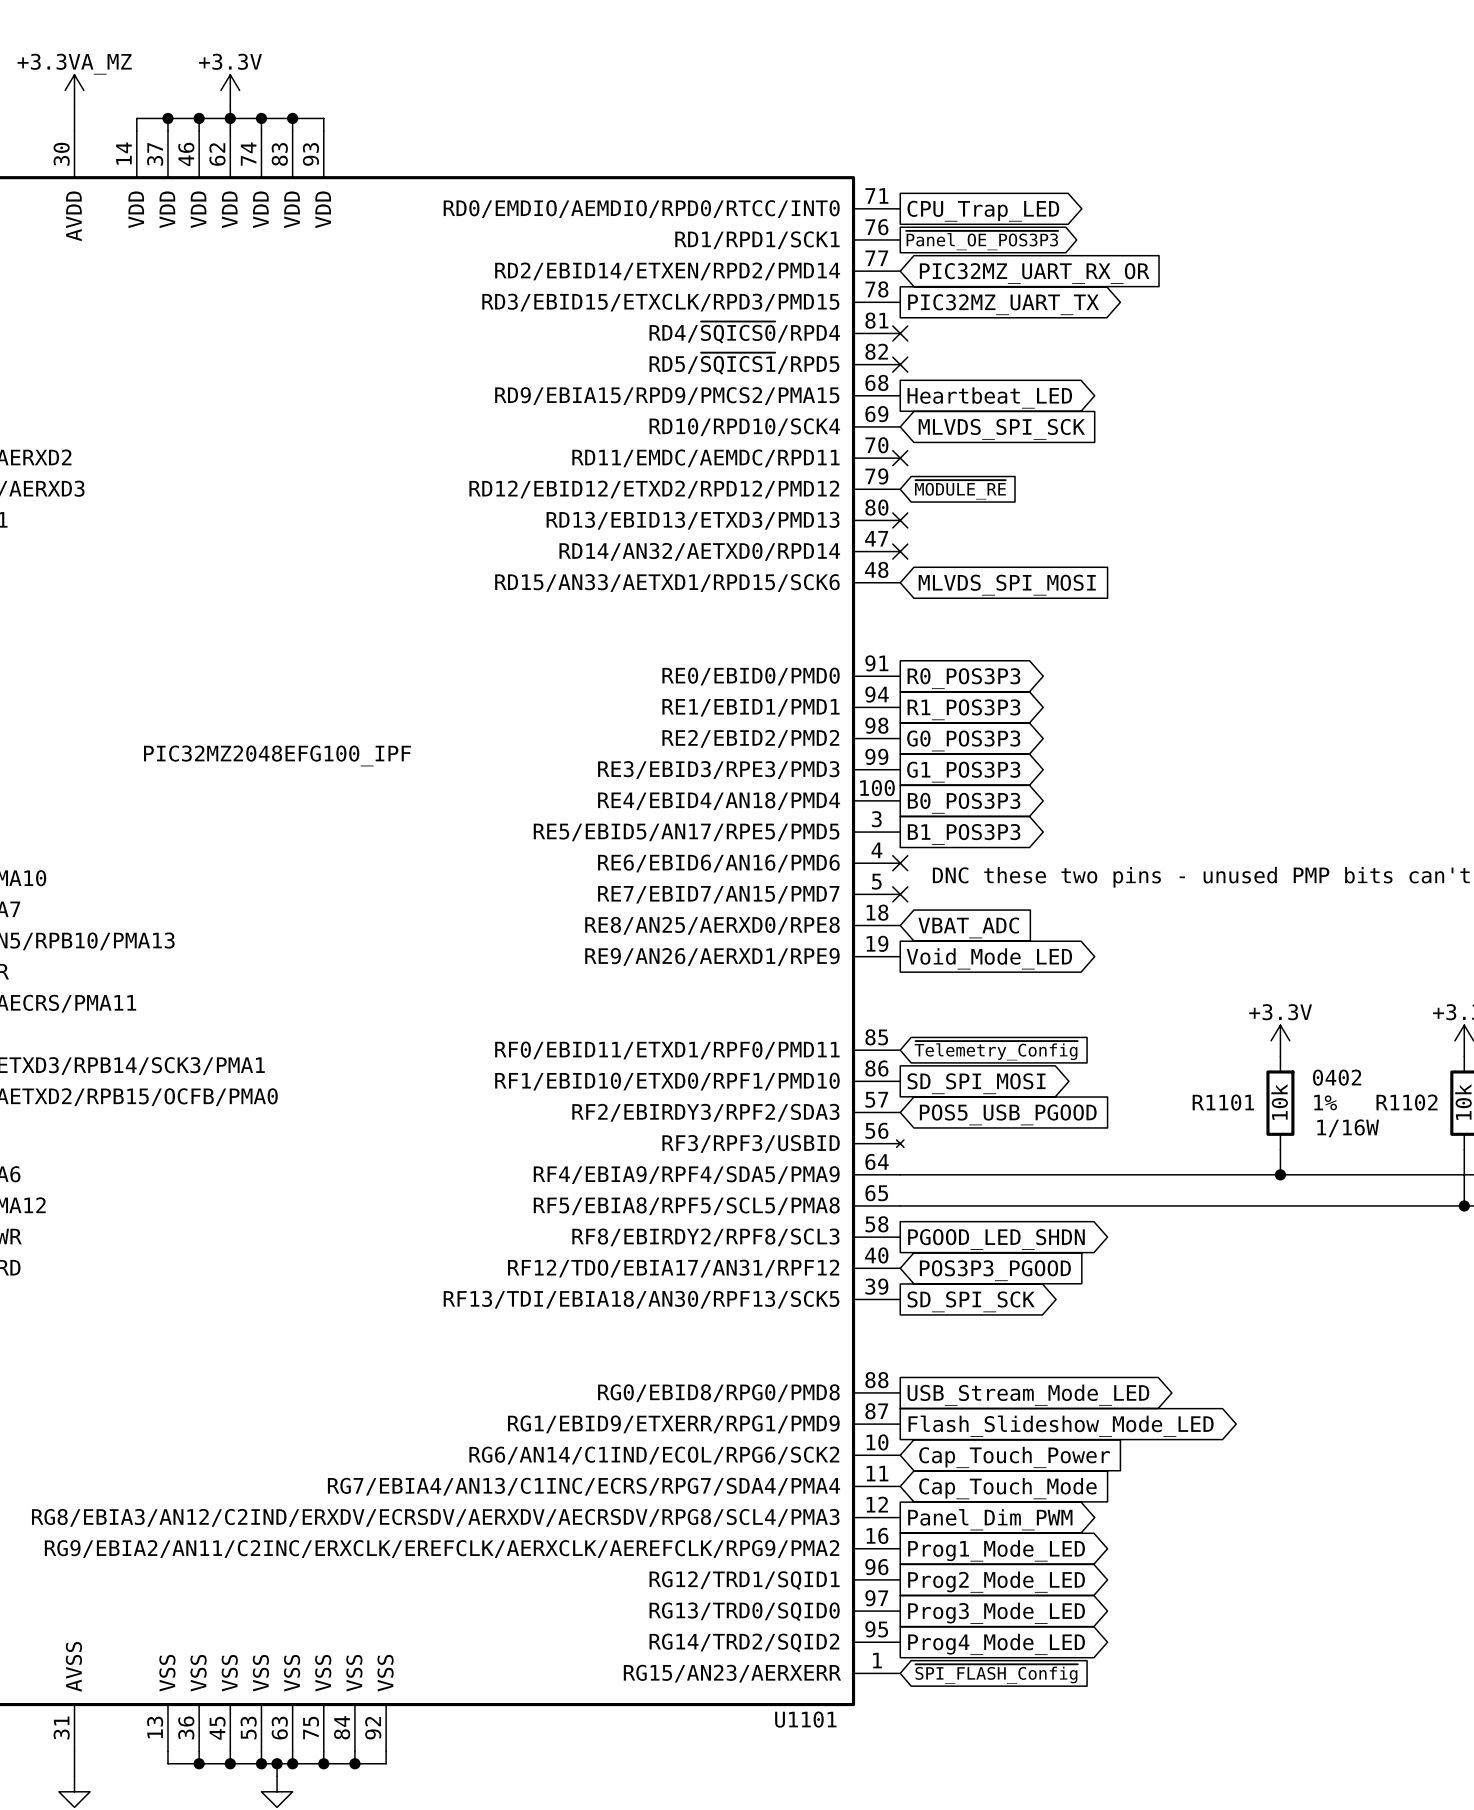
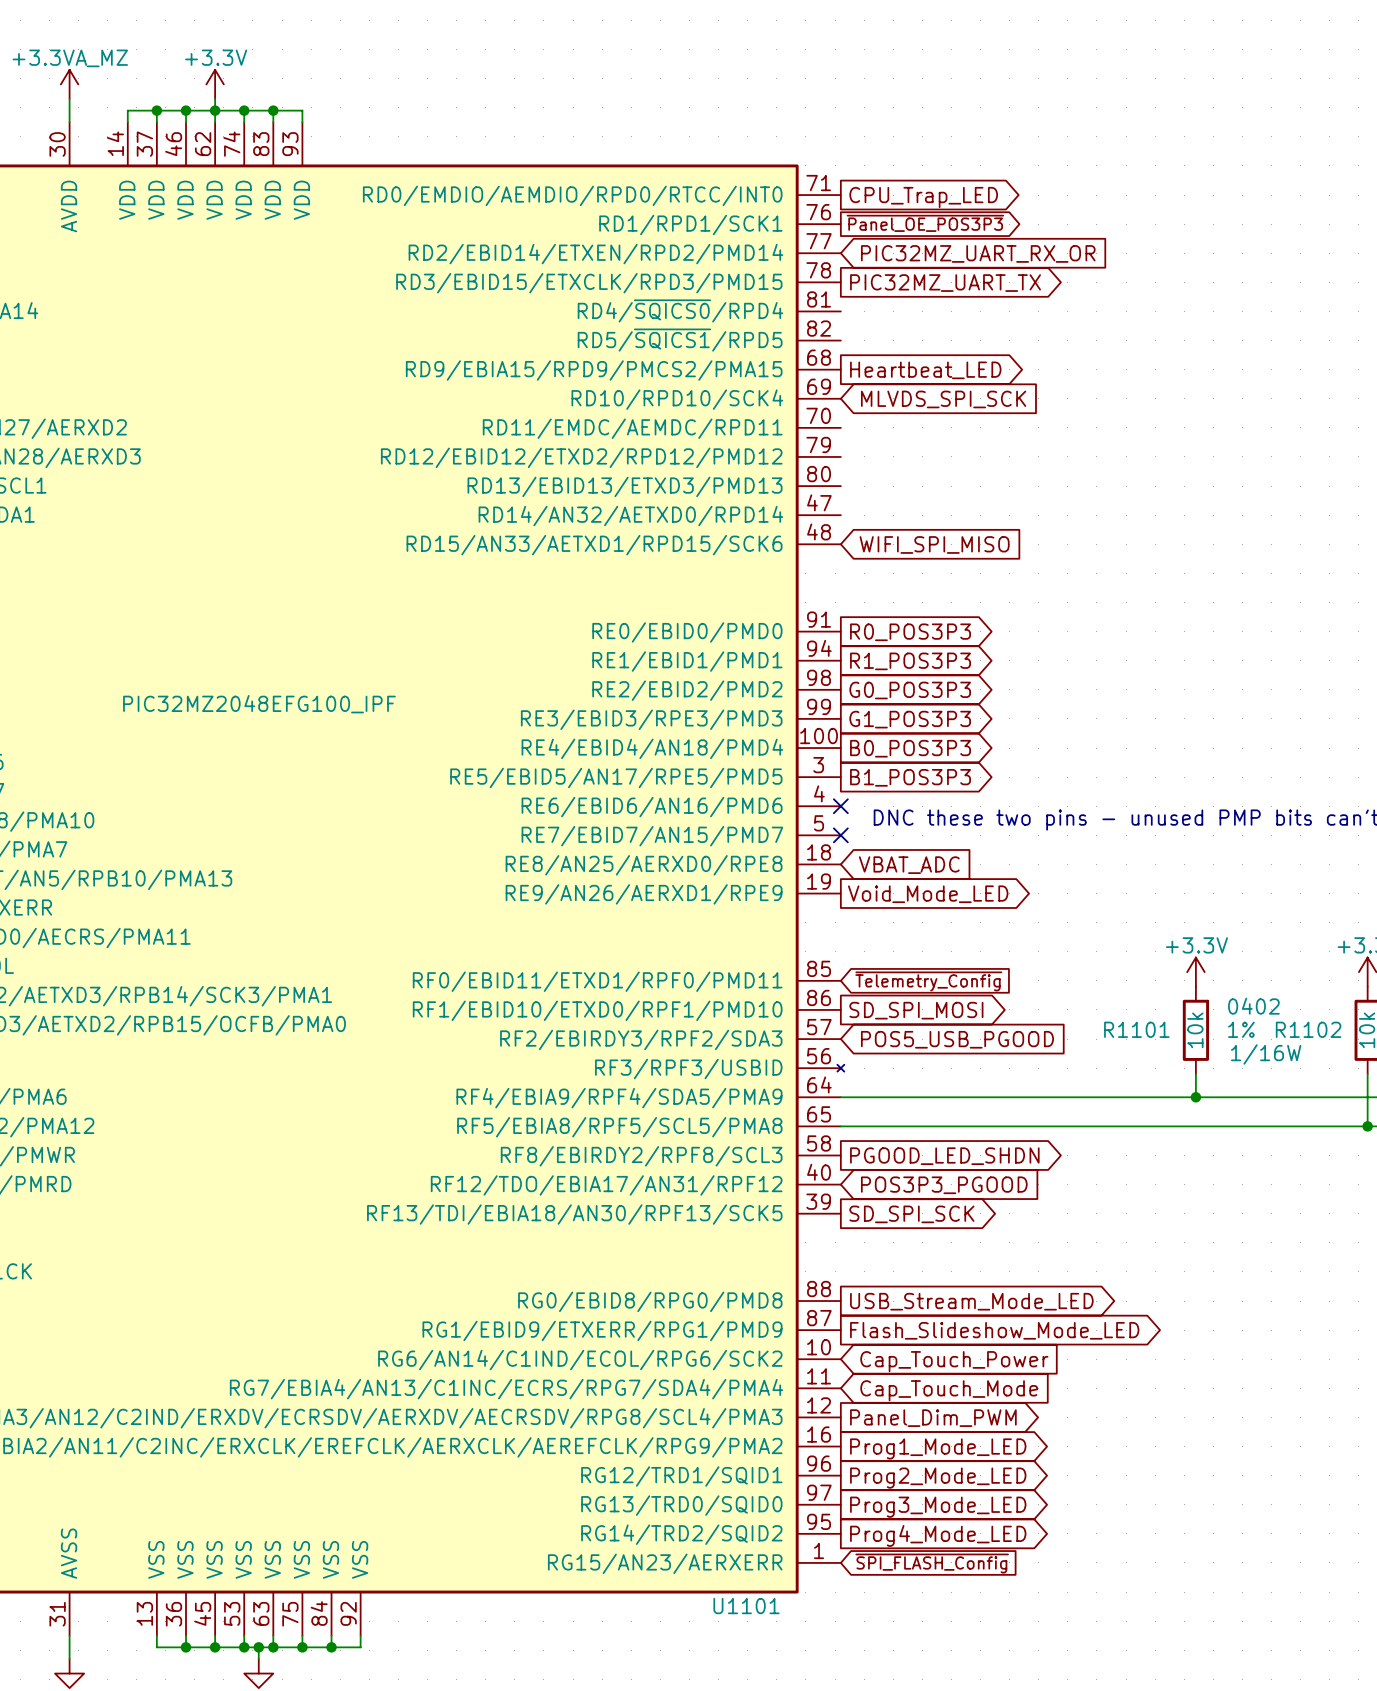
no-connect mark: (900, 333) -> none
no-connect mark: (900, 364) -> none
no-connect mark: (900, 458) -> none
global label: ~{MODULE_RE} (960, 489) -> none
no-connect mark: (900, 520) -> none
no-connect mark: (900, 551) -> none
global label: MLVDS_SPI_MOSI (1007, 585) -> WIFI_SPI_MISO (934, 544)

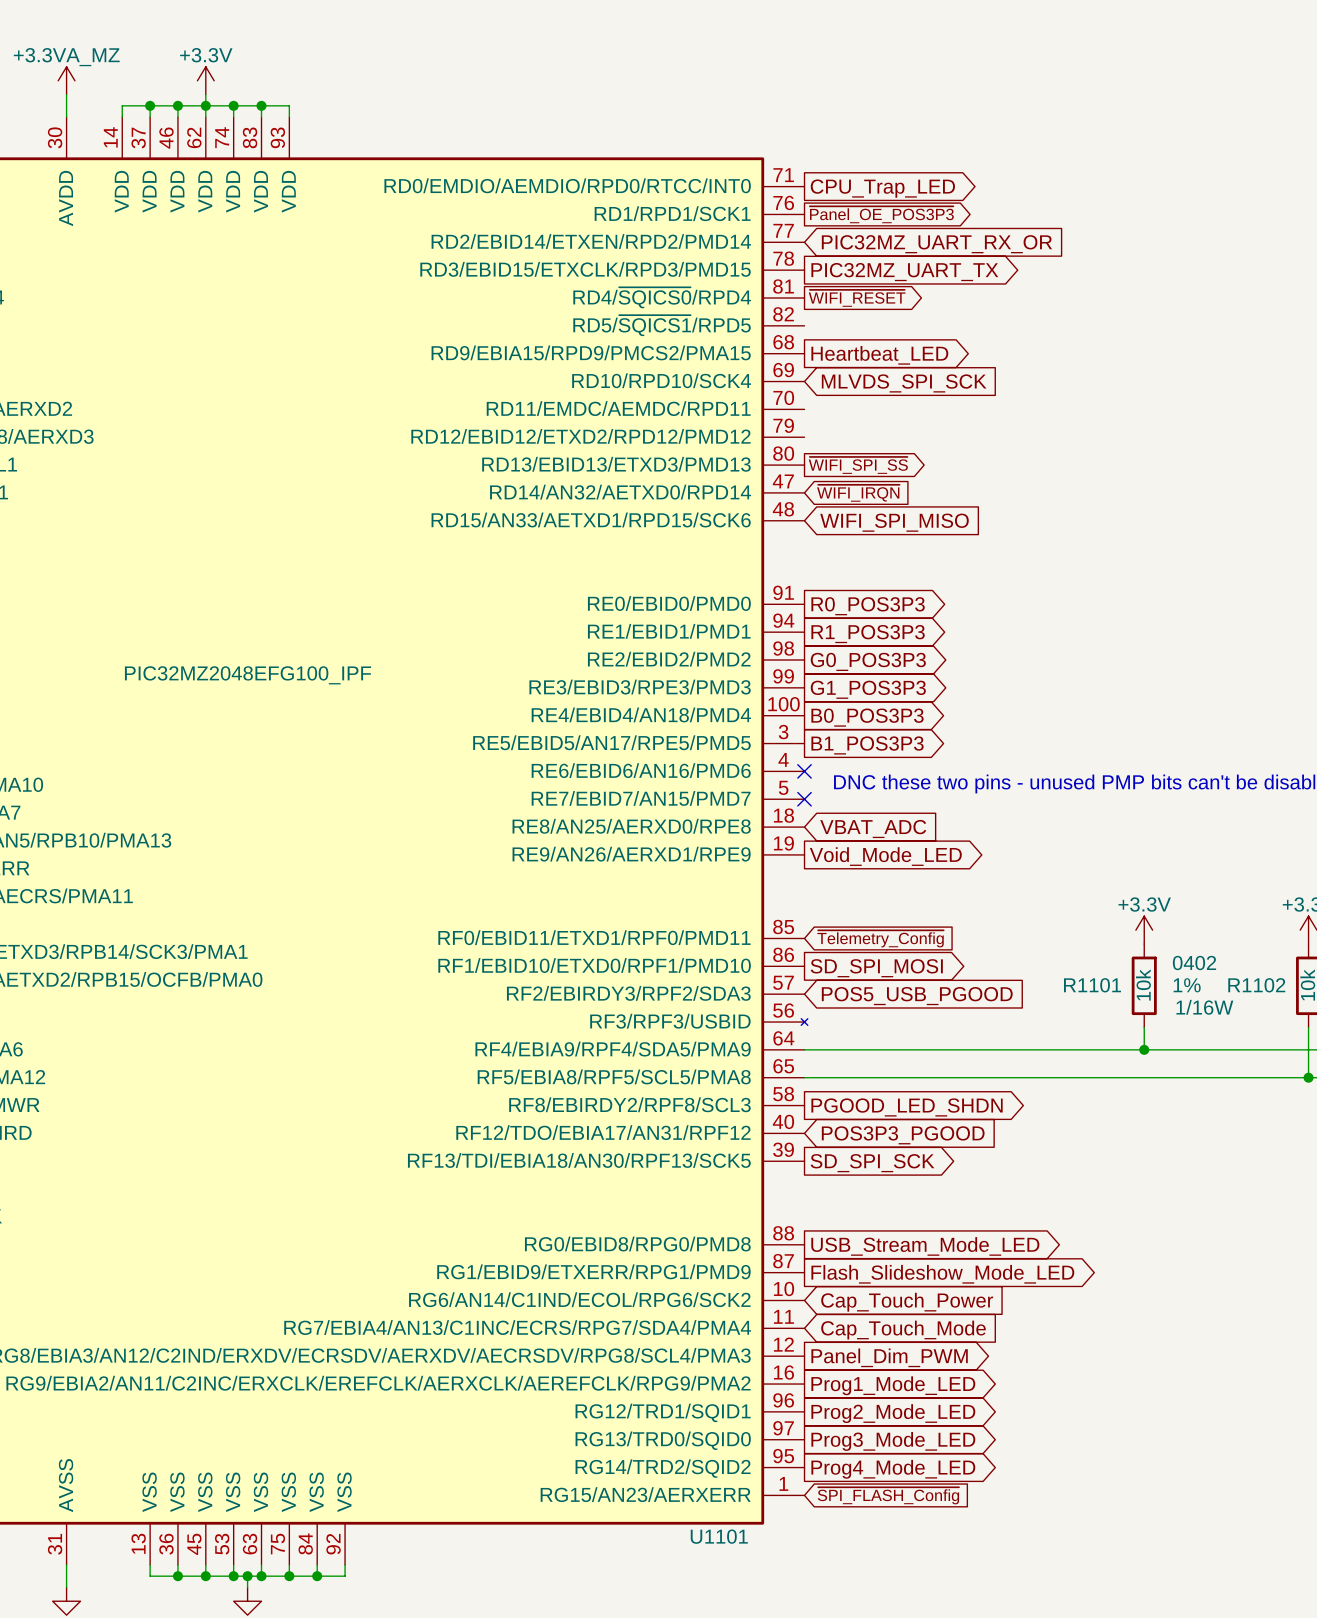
global label: none -> ~{WIFI_RESET} (857, 298)
global label: none -> ~{WIFI_SPI_SS} (858, 465)
global label: none -> ~{WIFI_IRQN} (858, 493)

